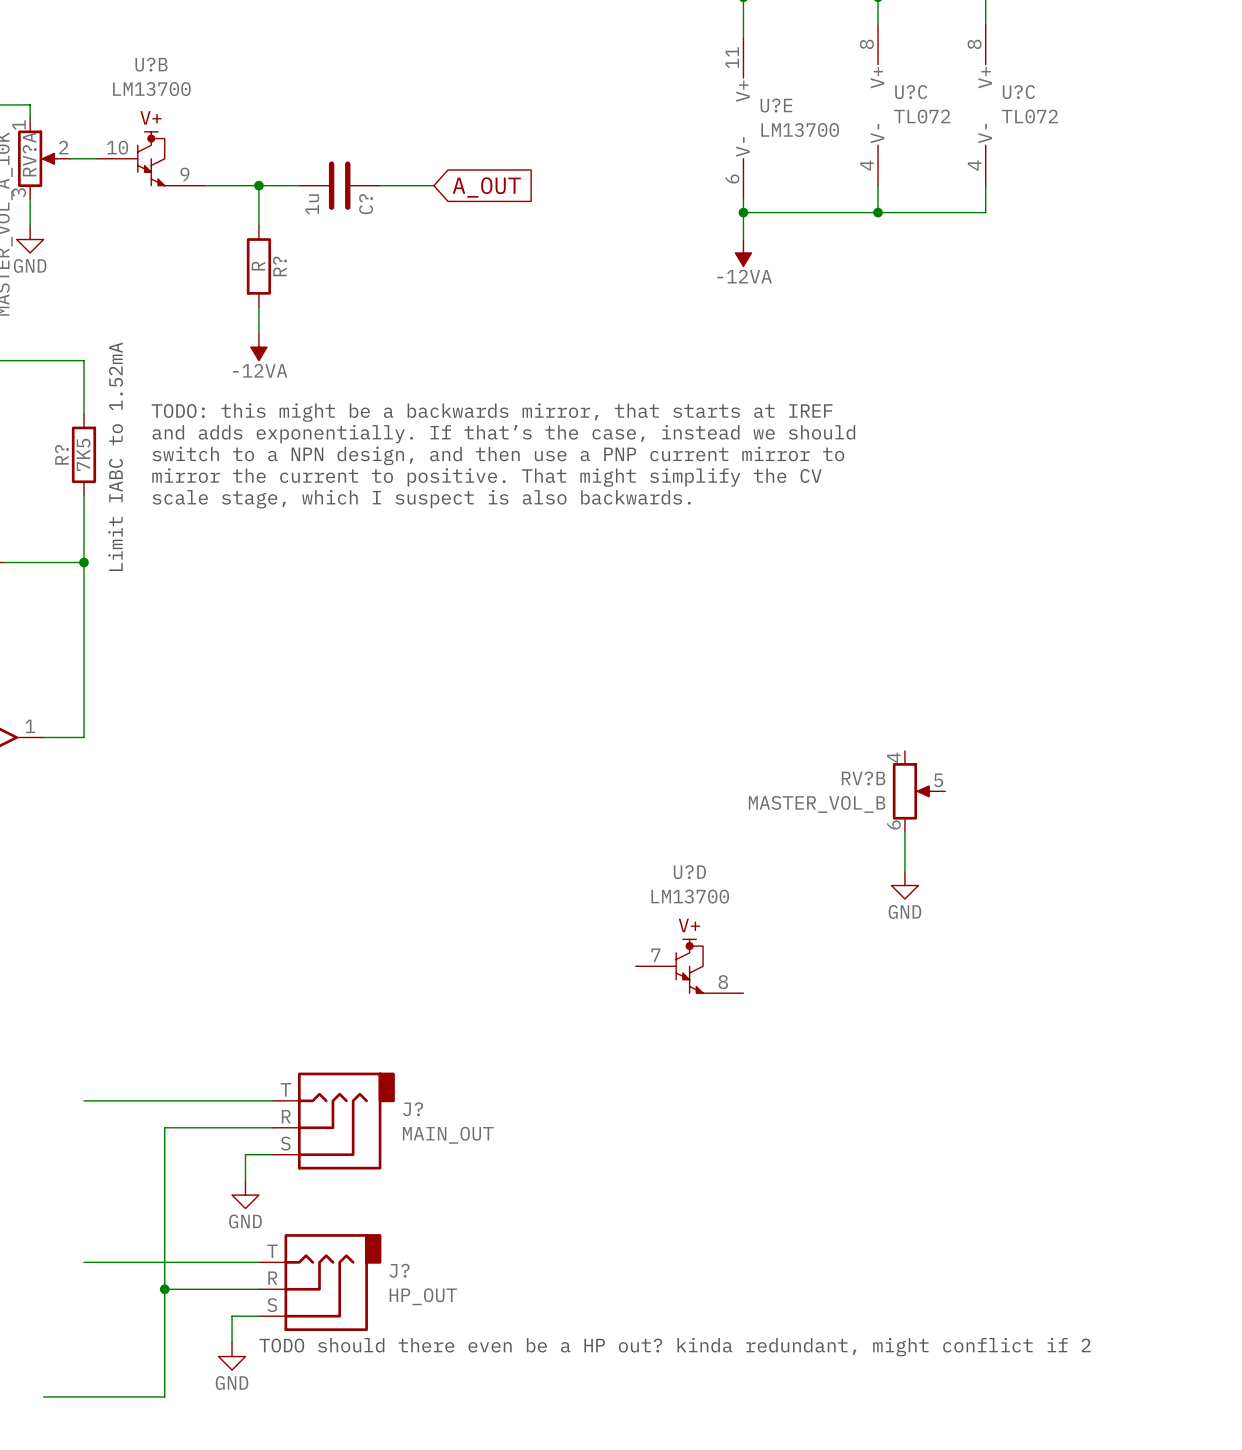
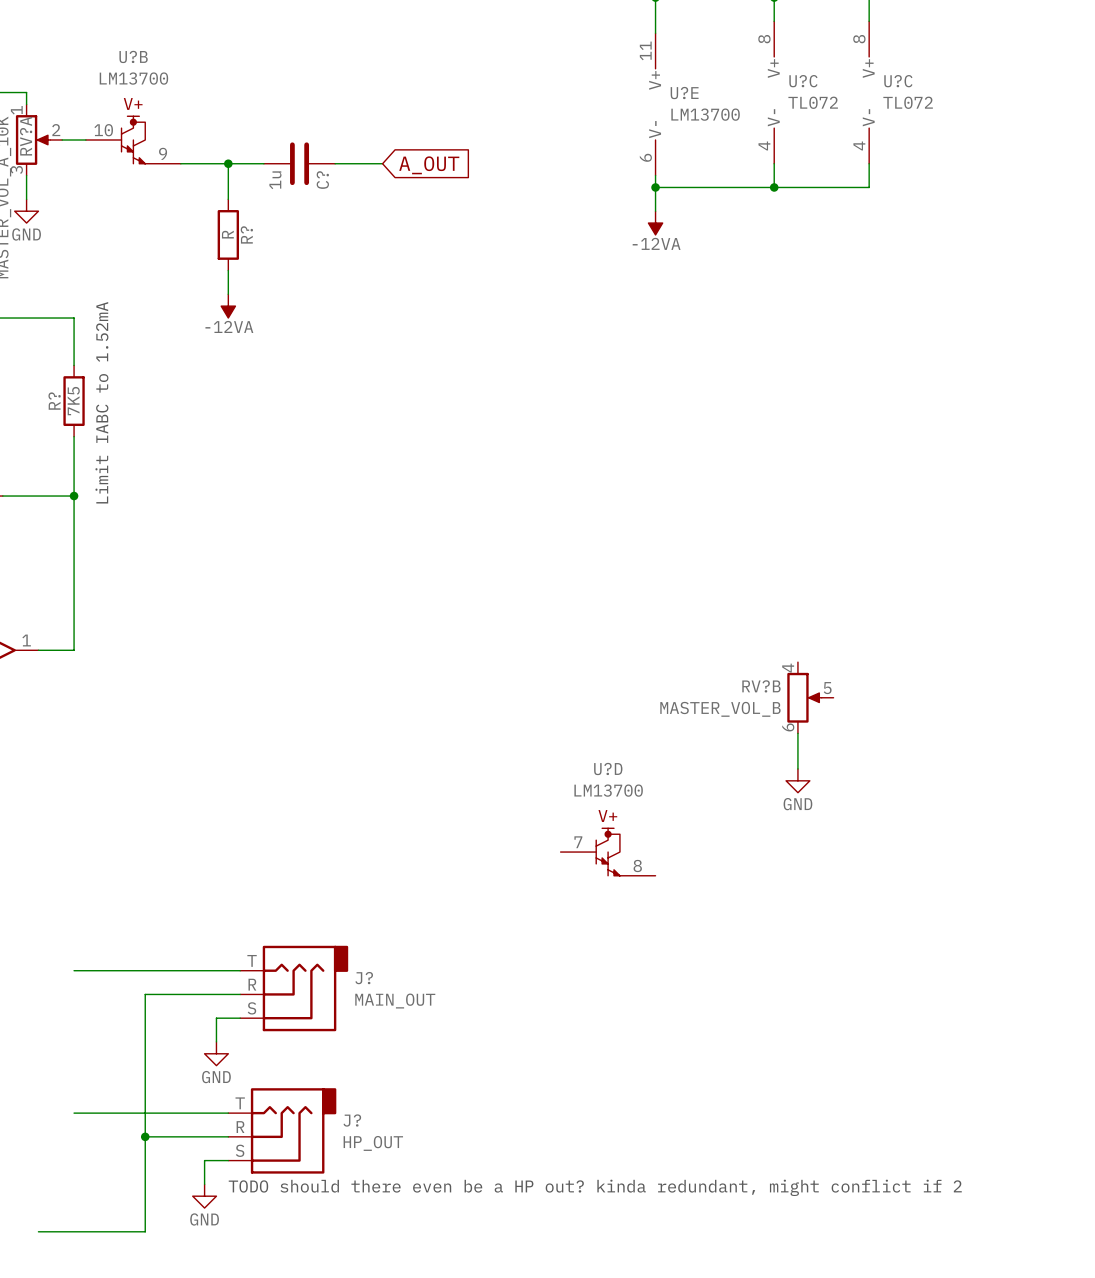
text: TODO: this might be a backwards mirror, that starts at IREF (492, 412) -> none
text: and adds exponentially. If that’s the case, instead we should (503, 434) -> none
text: switch to a NPN design, and then use a PNP current mirror to (498, 455) -> none
text: mirror the current to positive. That might simplify the CV (486, 477) -> none
text: scale stage, which I suspect is also backwards. (421, 499) -> none

